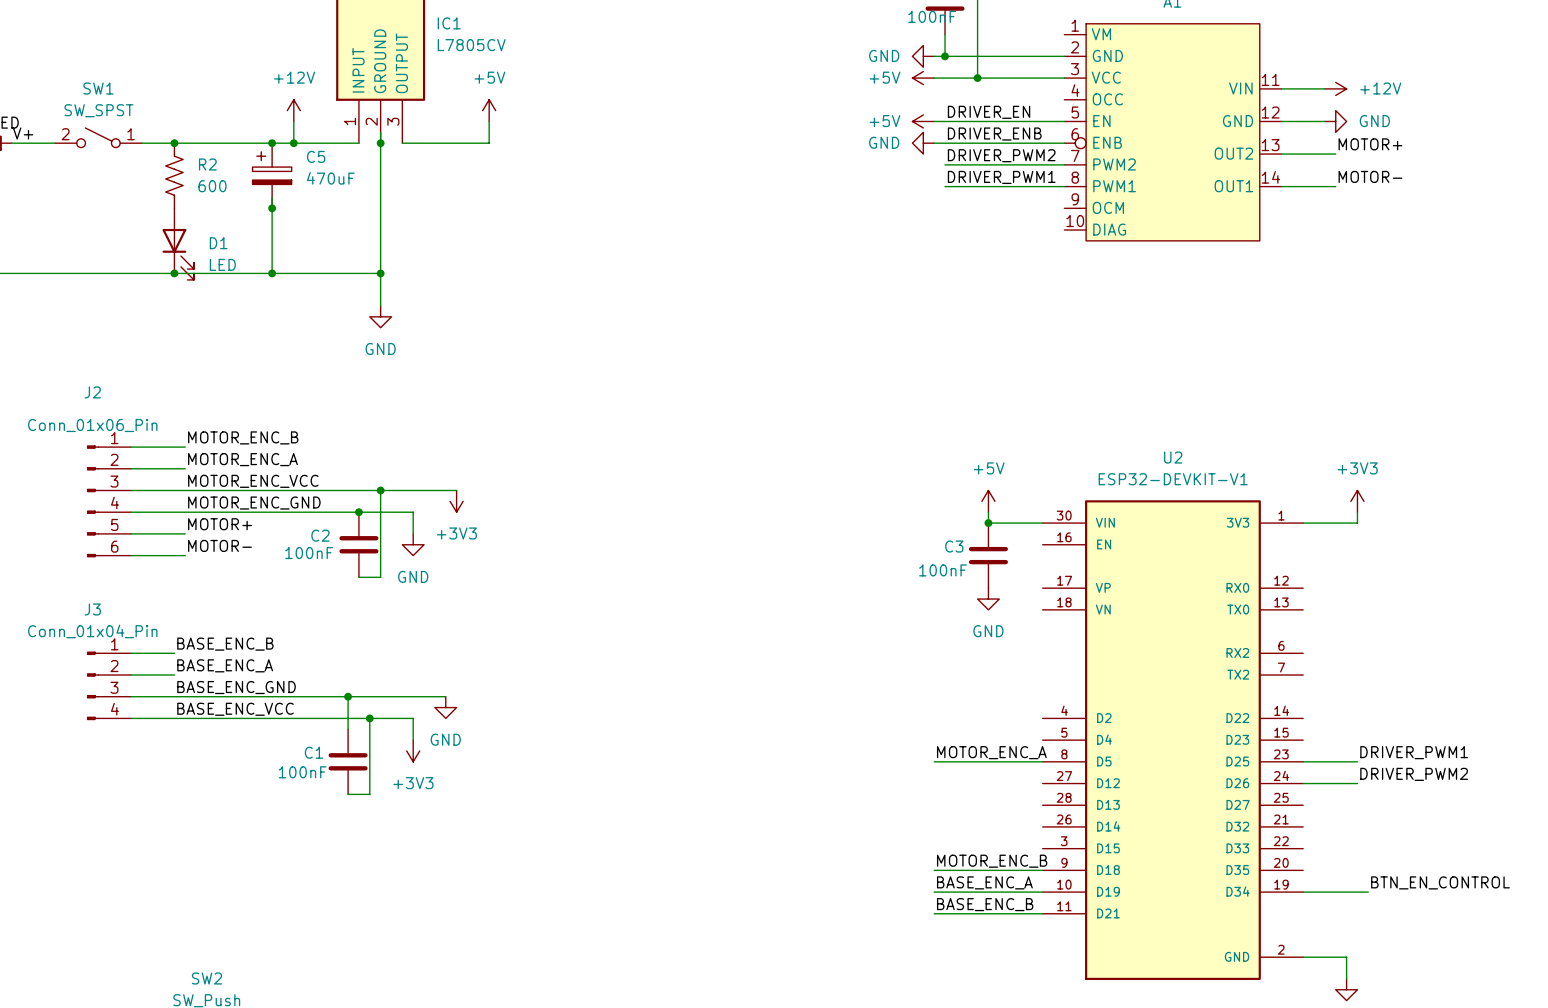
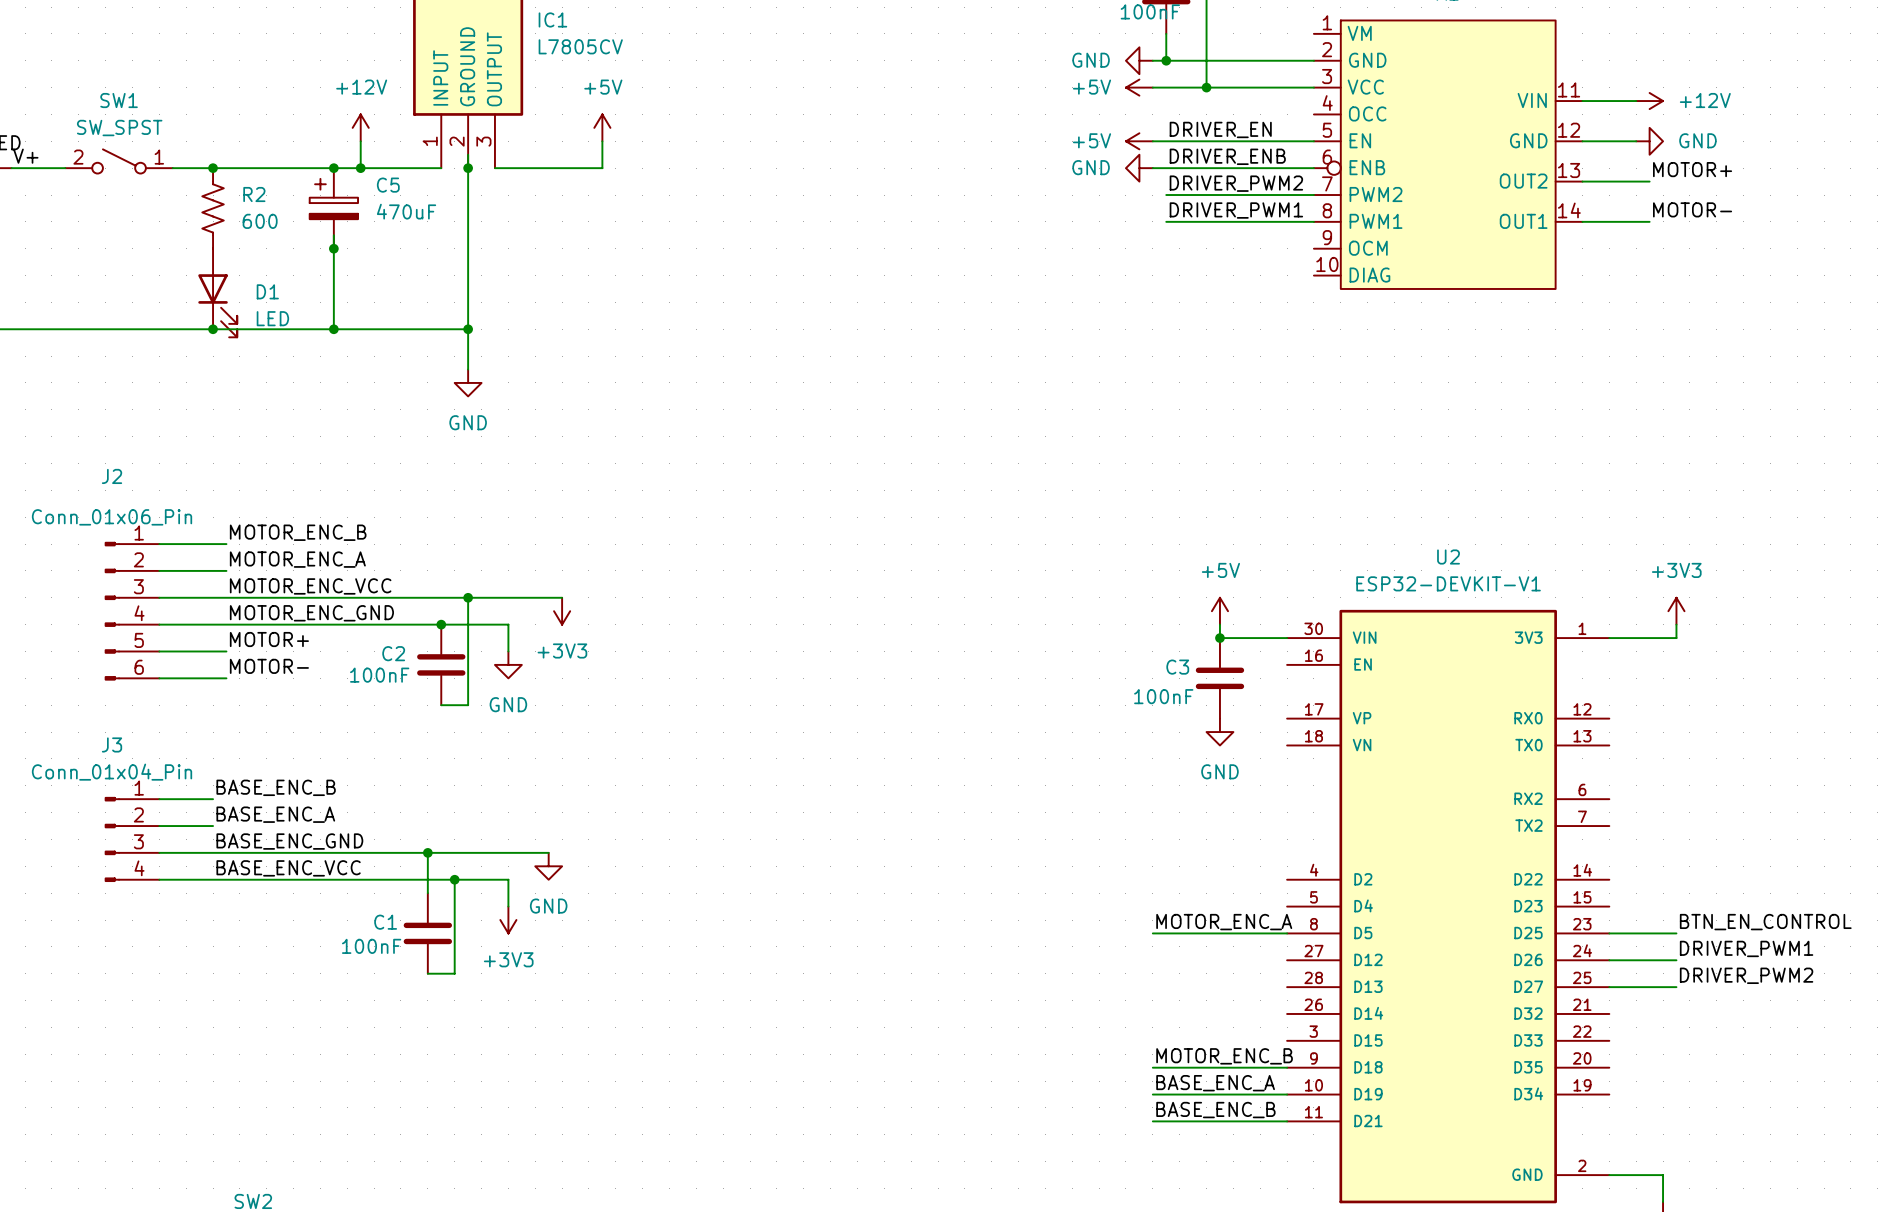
label: DRIVER_PWM1 (1414, 752) -> BTN_EN_CONTROL (1765, 922)
label: DRIVER_PWM2 (1414, 774) -> DRIVER_PWM1 (1746, 948)
label: none -> DRIVER_PWM2 (1746, 975)
wire: none -> (1609, 987) (1676, 987)
label: BTN_EN_CONTROL (1440, 882) -> none
wire: (1303, 892) (1368, 892) -> none

